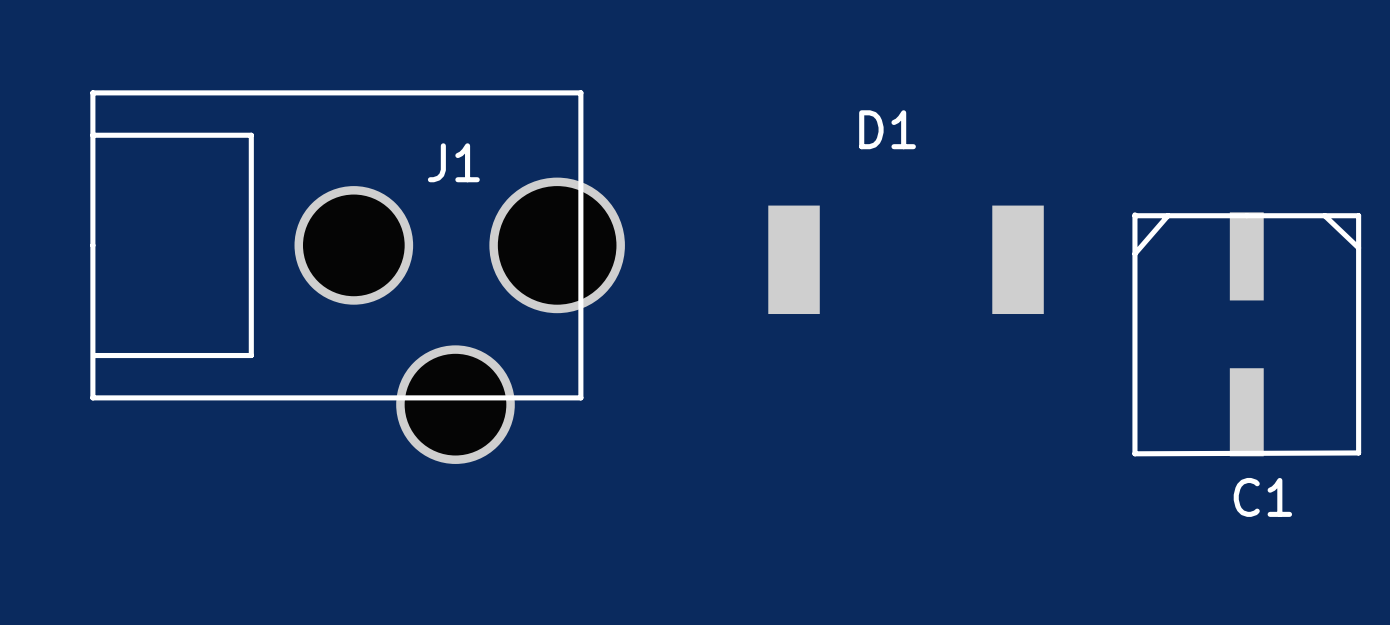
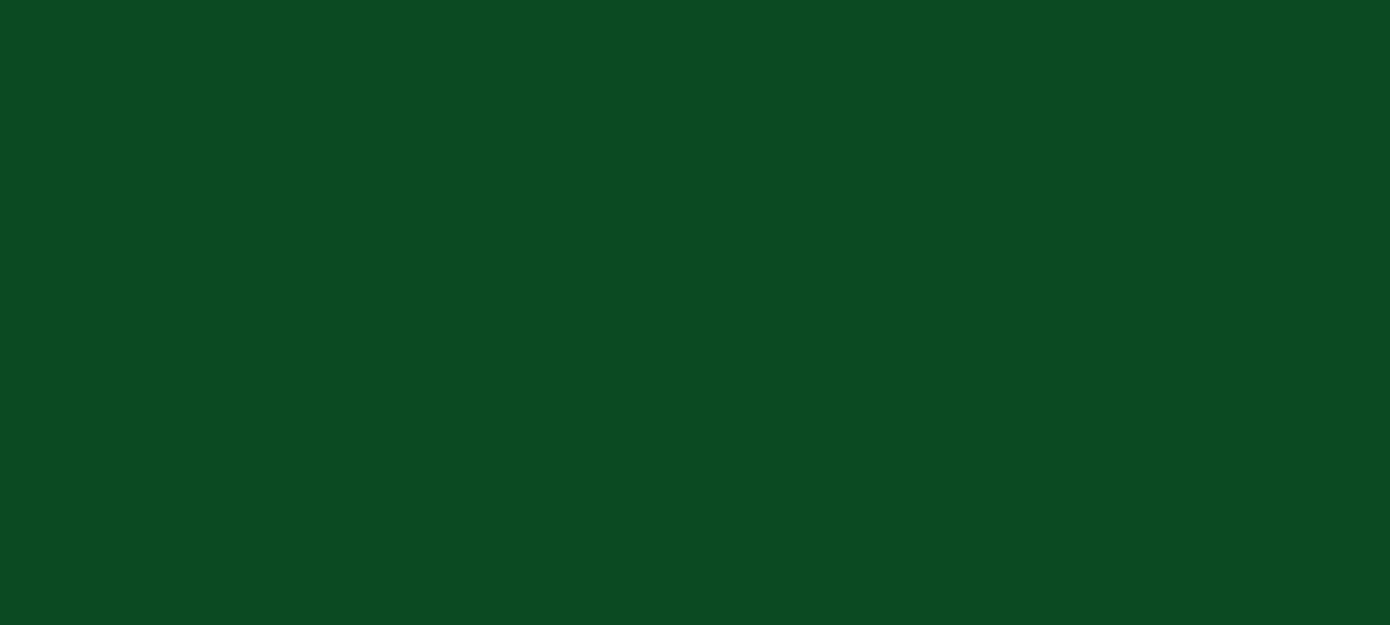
D1: (906, 259) -> none
J1: (357, 277) -> none
C1: (1246, 334) -> none

